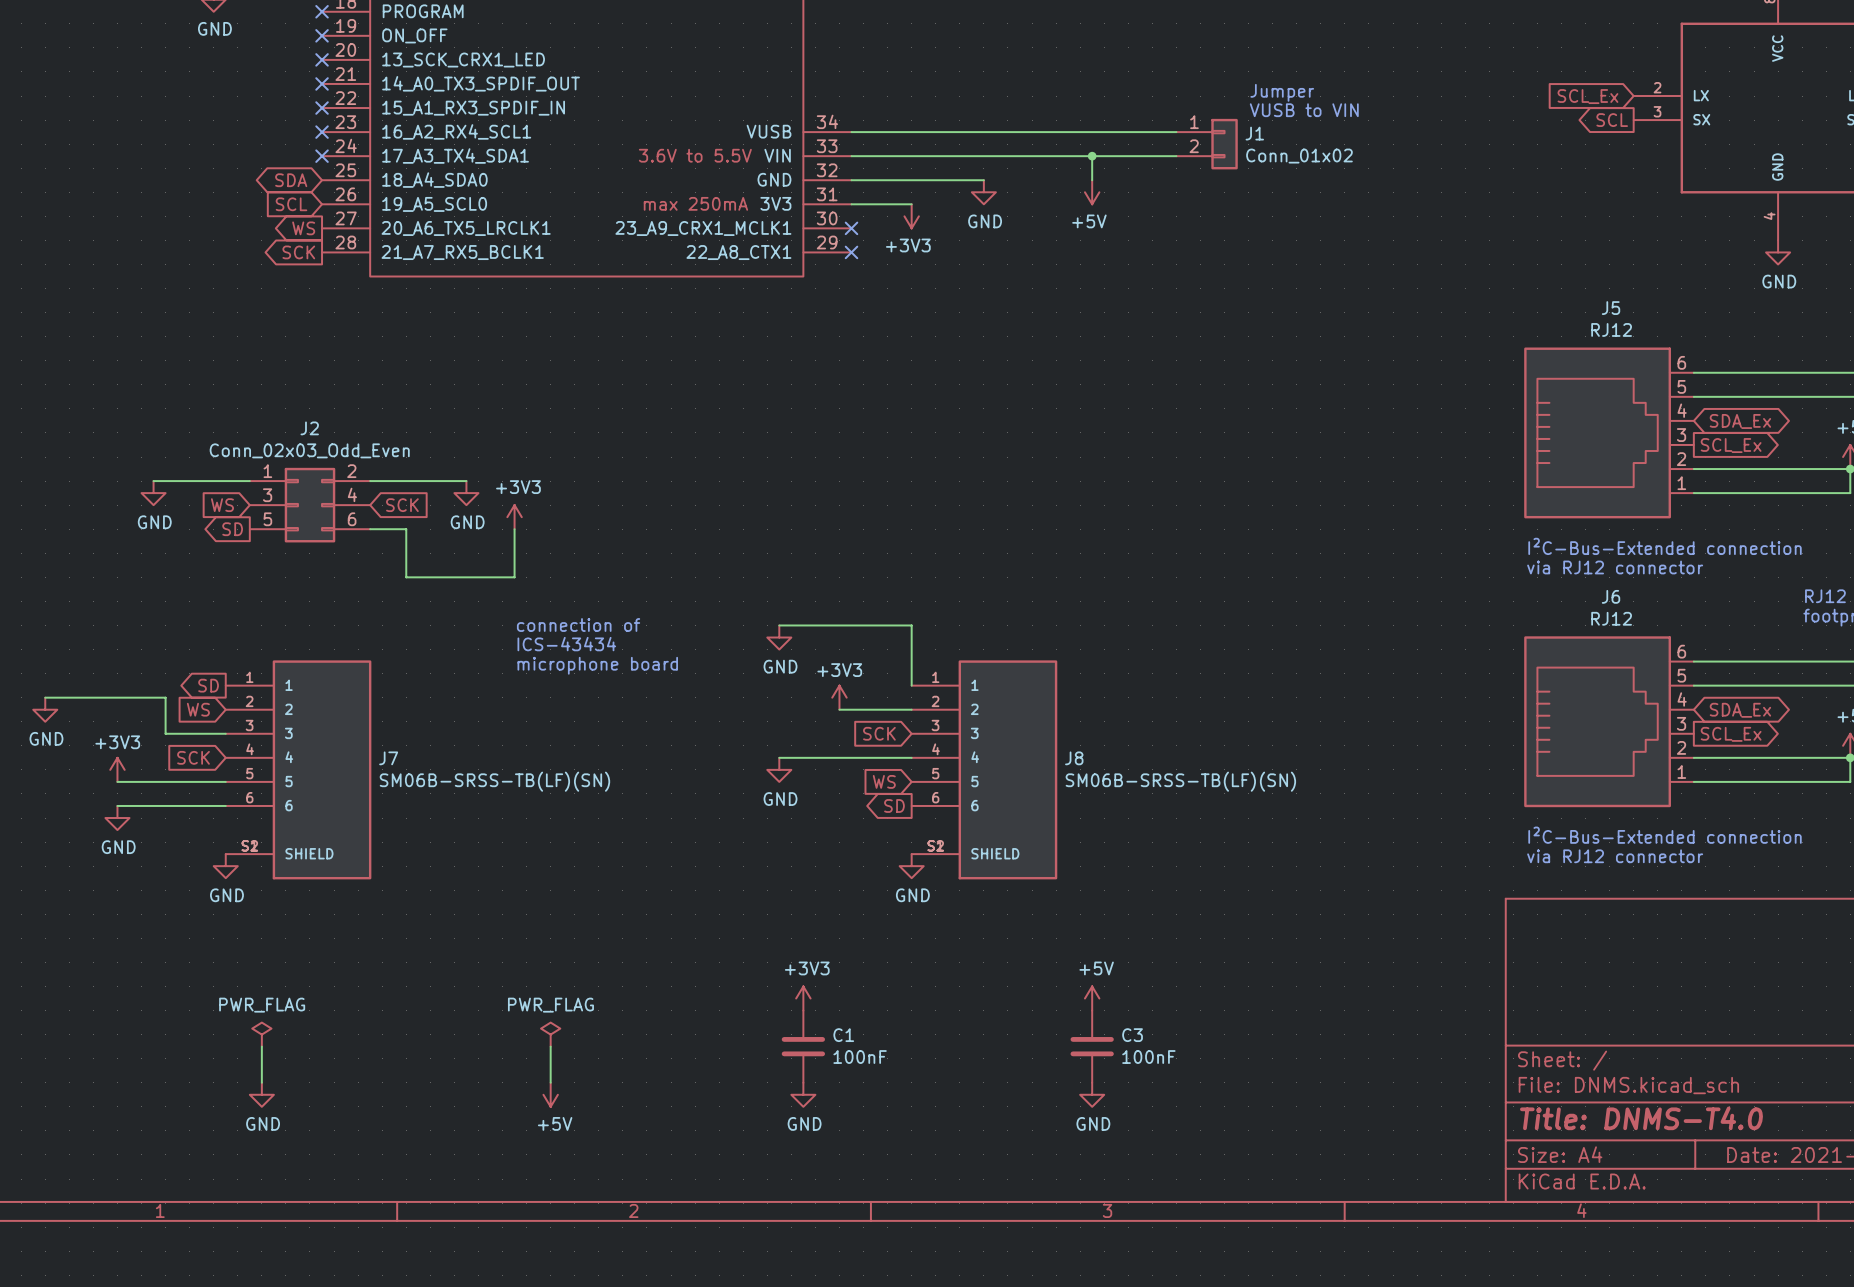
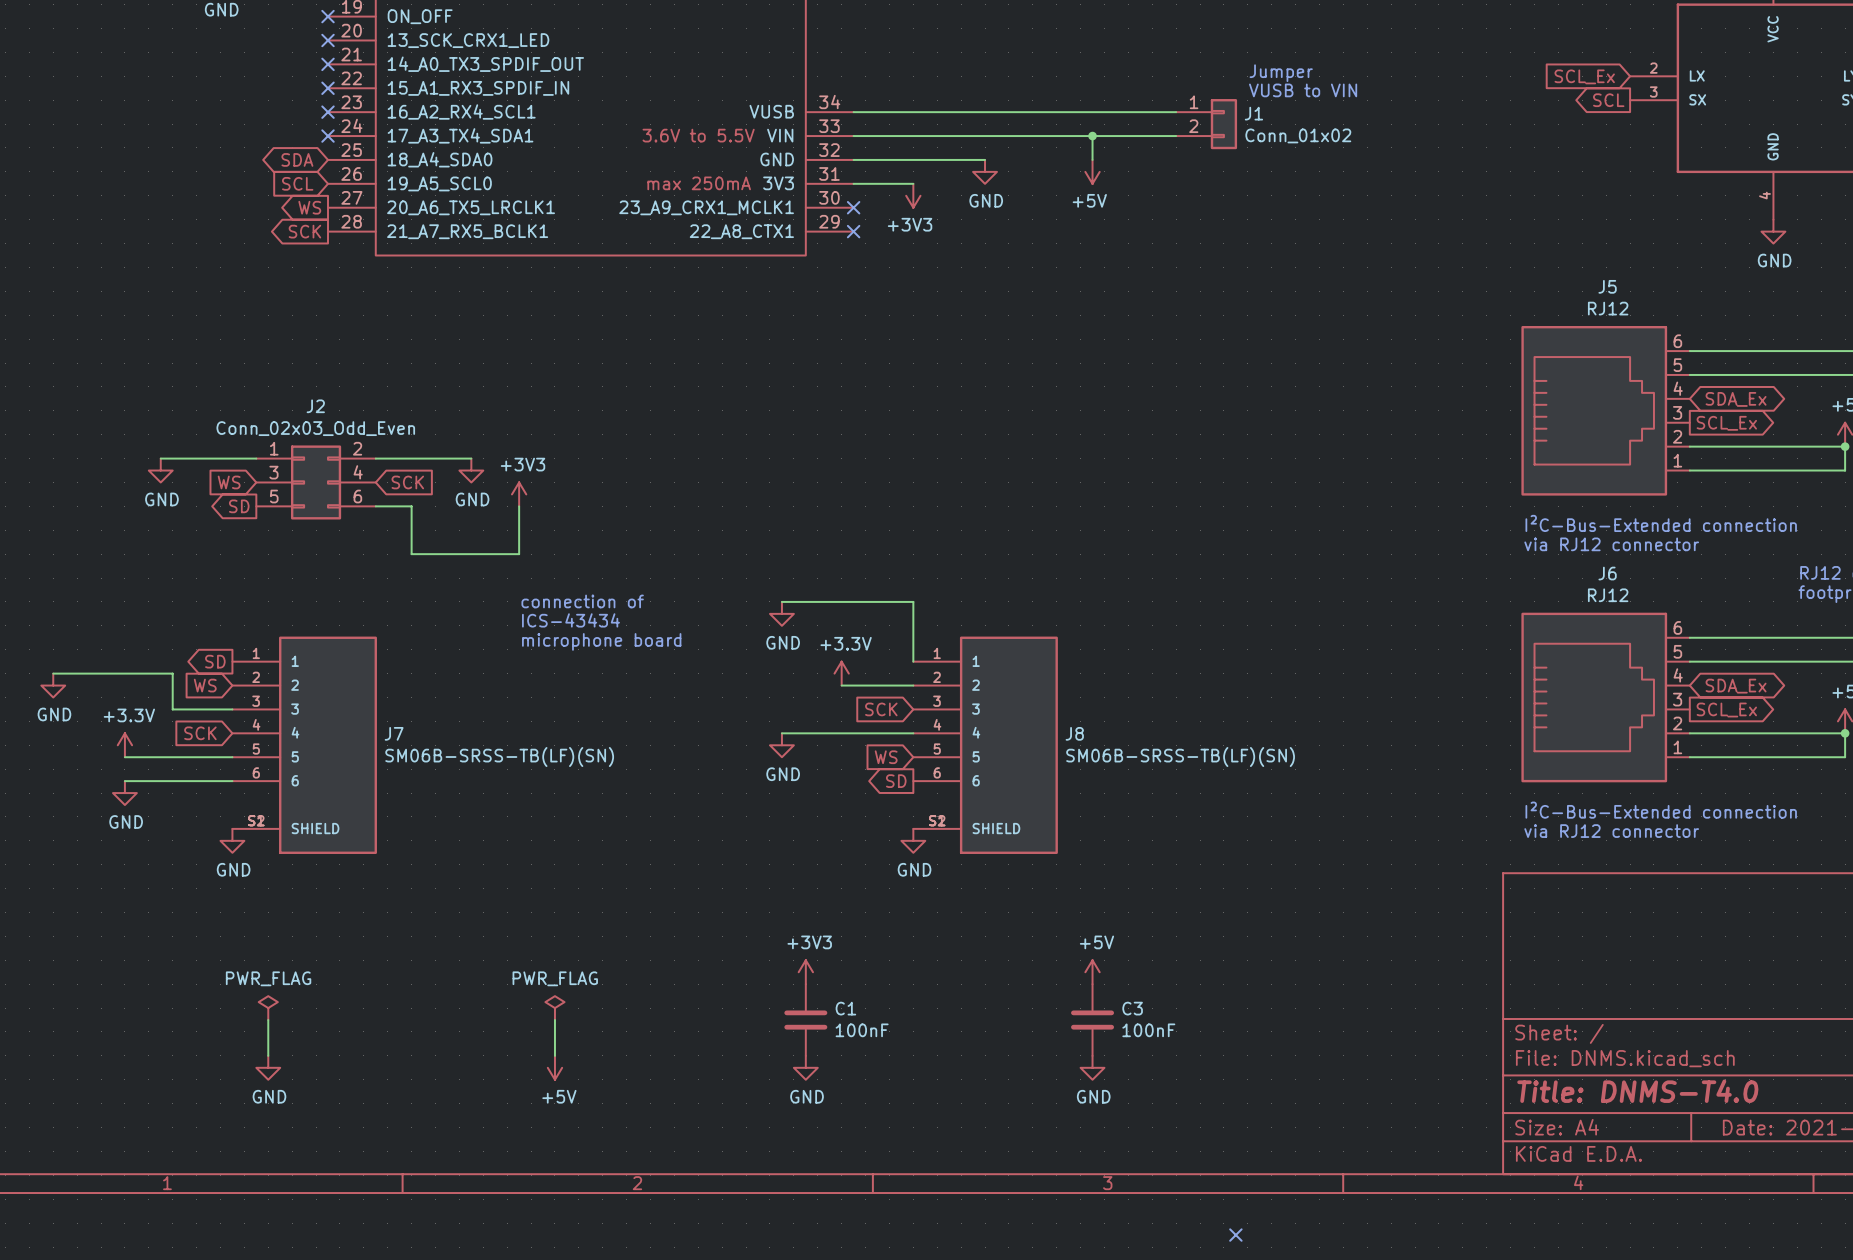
power symbol: +3V3 (839, 697) -> +3.3V (841, 673)
power symbol: +3V3 (117, 769) -> +3.3V (124, 745)
no-connect mark: none -> (1235, 1235)

